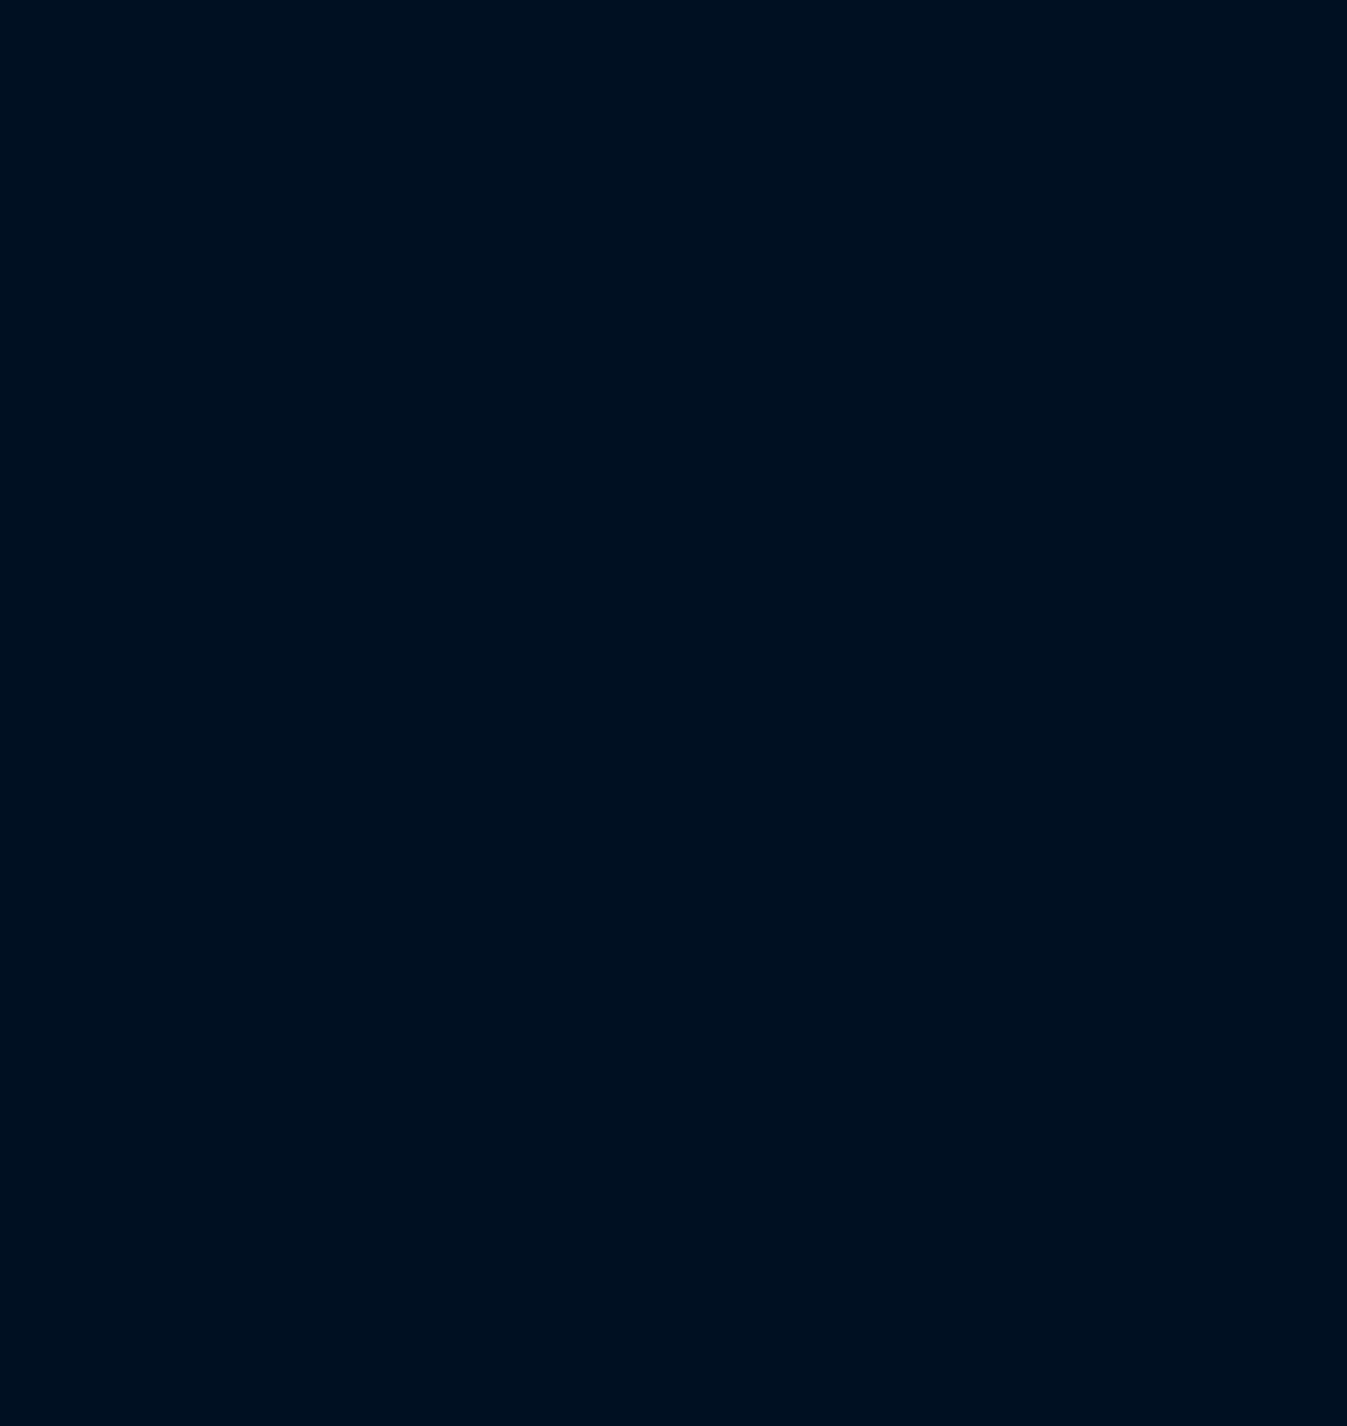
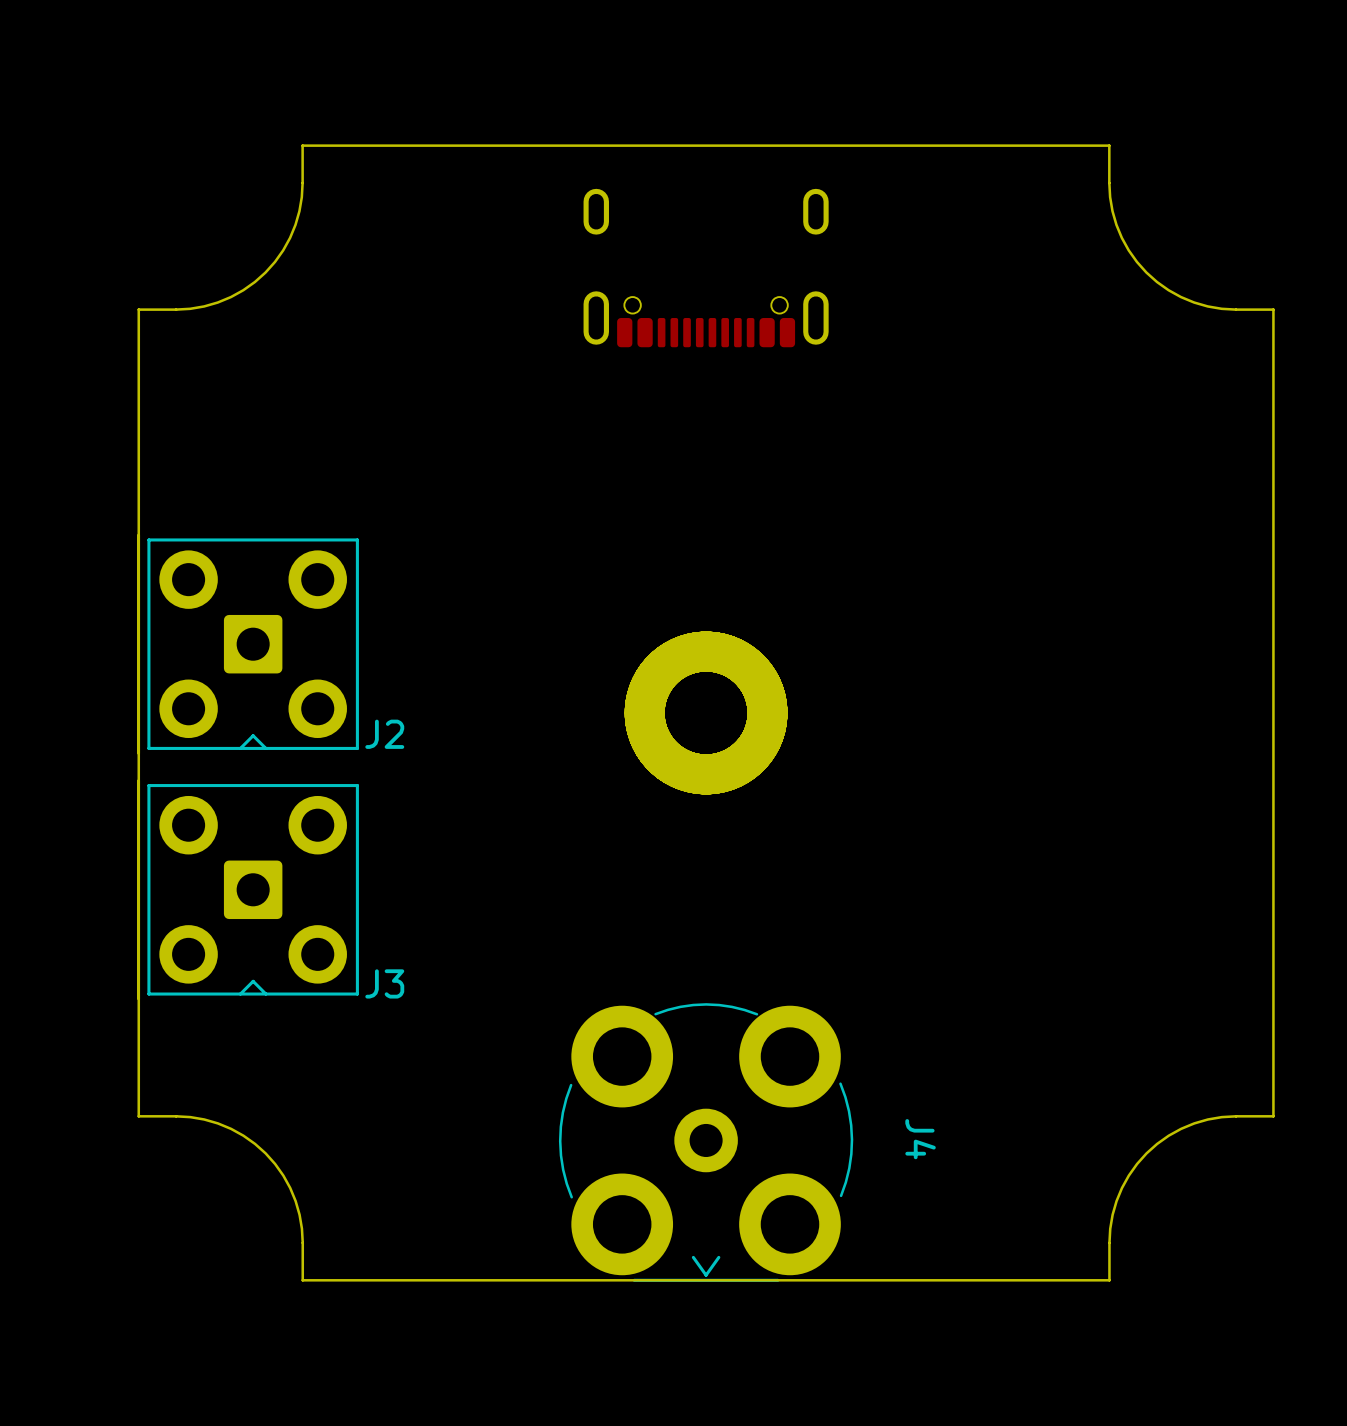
board edge: none -> (1109, 145) (302, 145) (301, 197) (295, 224) (283, 250) (265, 272) (243, 290) (217, 302) (190, 308) (138, 309) (138, 1116) (190, 1117) (217, 1123) (243, 1135) (265, 1153) (283, 1175) (295, 1201) (301, 1228) (302, 1280) (1109, 1280) (1110, 1228) (1116, 1201) (1128, 1175) (1146, 1153) (1168, 1135) (1194, 1123) (1221, 1117) (1273, 1116) (1273, 309) (1221, 308) (1194, 302) (1168, 290) (1146, 272) (1128, 250) (1116, 224) (1110, 197) (1109, 145)
part: none -> (706, 268)
J2: none -> (248, 644)
part: none -> (706, 712)
J3: none -> (248, 889)
J4: none -> (706, 1142)

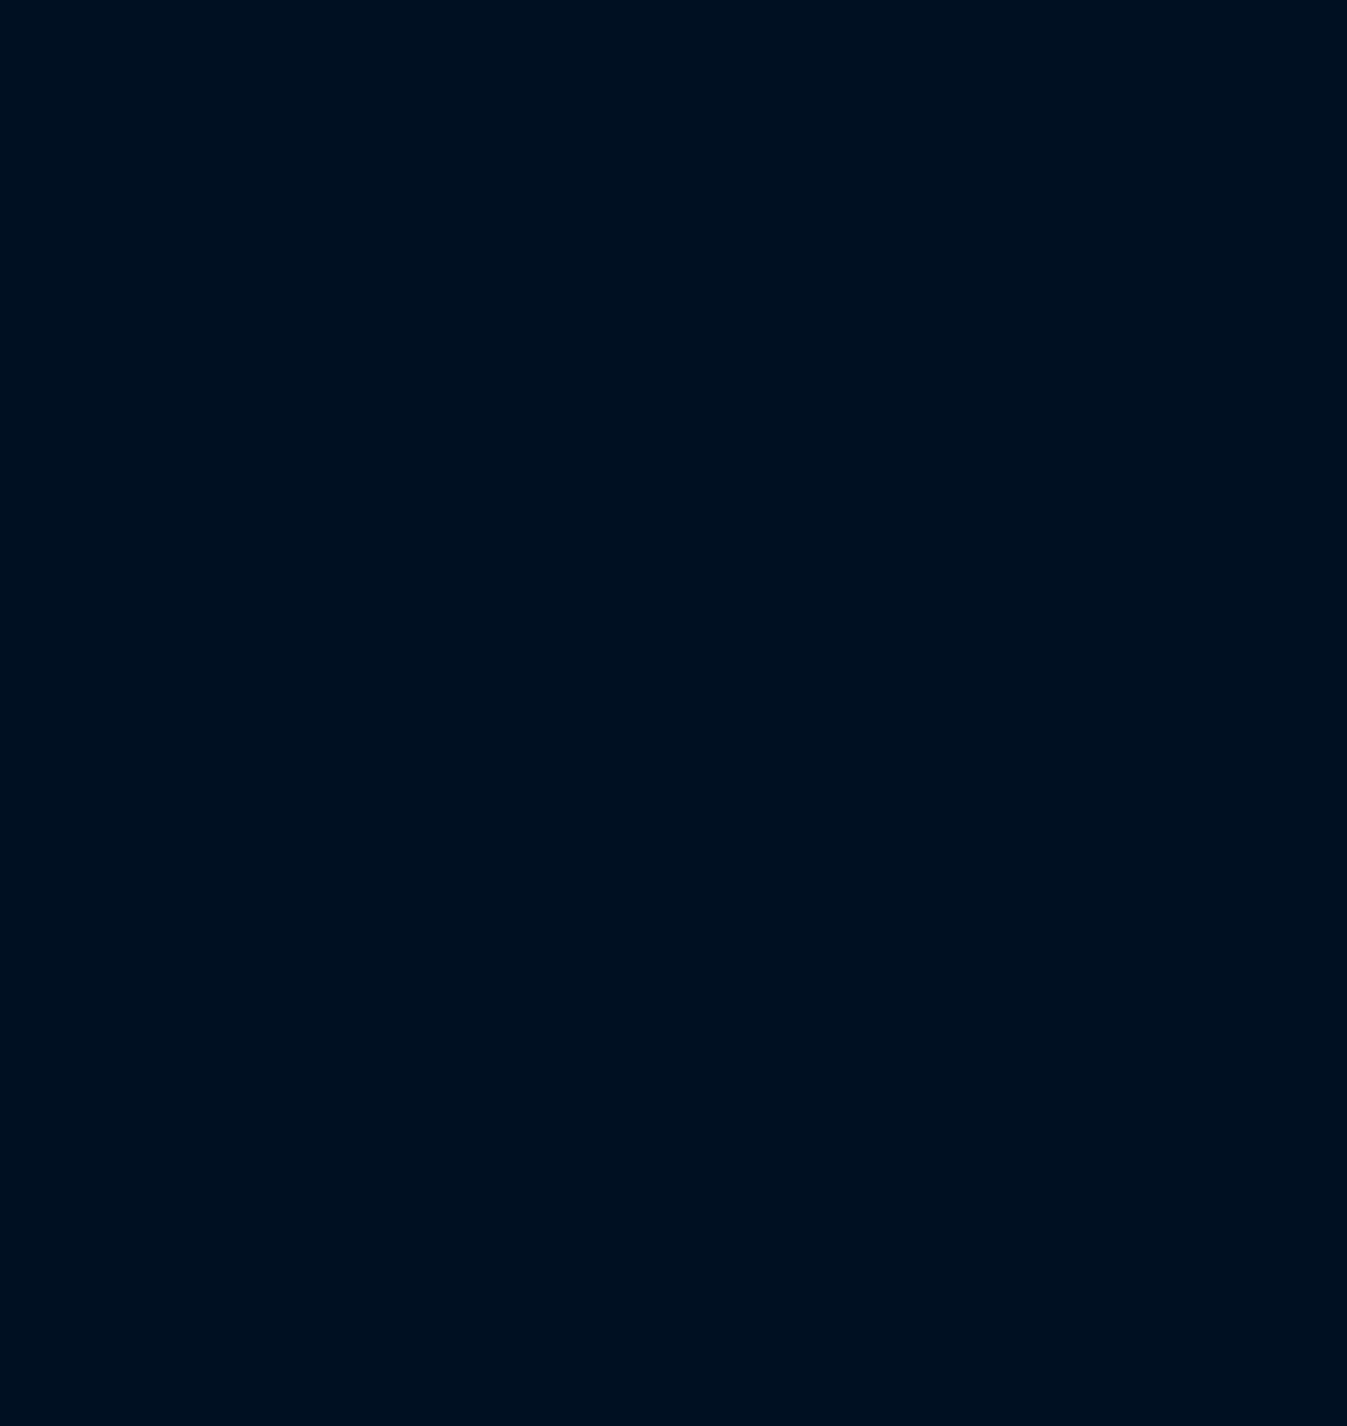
board edge: (1109, 145) (302, 145) (301, 197) (295, 224) (283, 250) (265, 272) (243, 290) (217, 302) (190, 308) (138, 309) (138, 1116) (190, 1117) (217, 1123) (243, 1135) (265, 1153) (283, 1175) (295, 1201) (301, 1228) (302, 1280) (1109, 1280) (1110, 1228) (1116, 1201) (1128, 1175) (1146, 1153) (1168, 1135) (1194, 1123) (1221, 1117) (1273, 1116) (1273, 309) (1221, 308) (1194, 302) (1168, 290) (1146, 272) (1128, 250) (1116, 224) (1110, 197) (1109, 145) -> none
part: (706, 268) -> none
J2: (248, 644) -> none
part: (706, 712) -> none
J3: (248, 889) -> none
J4: (706, 1142) -> none

